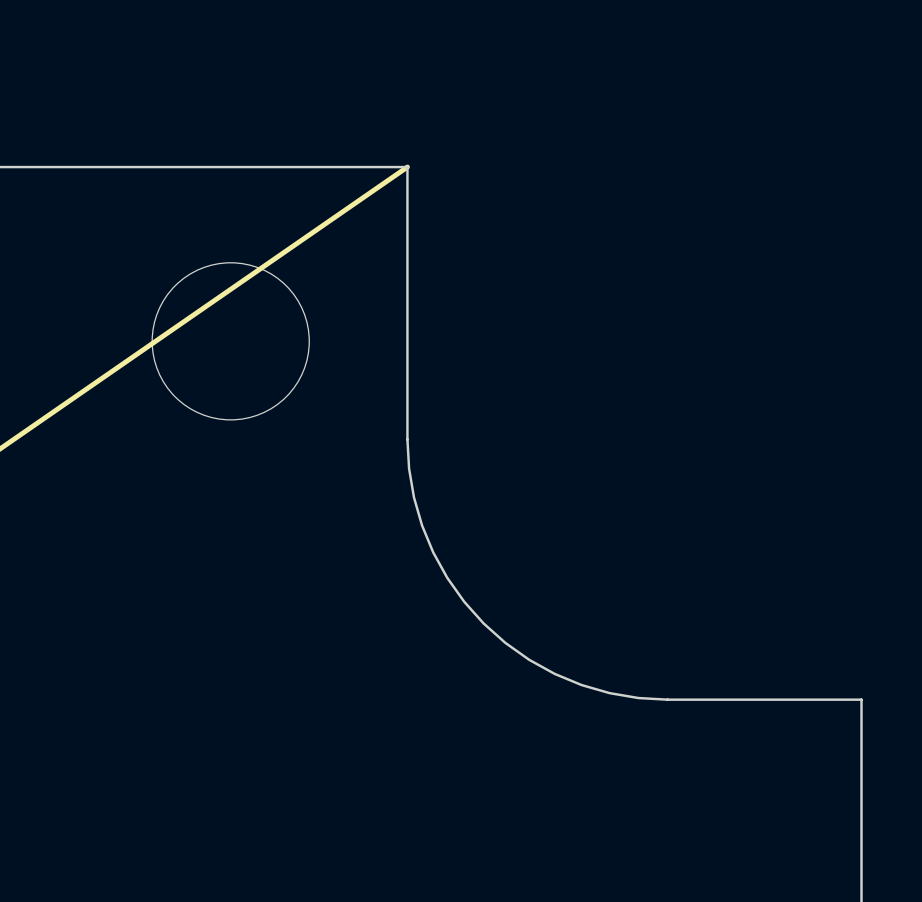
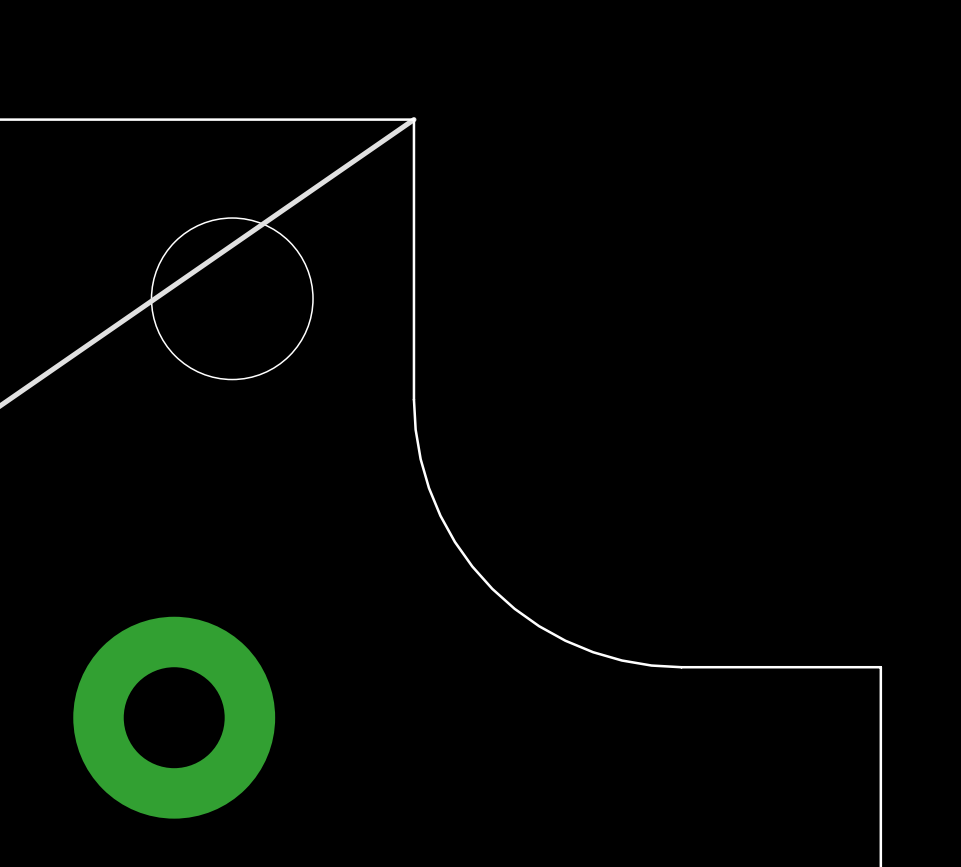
part: none -> (174, 717)

